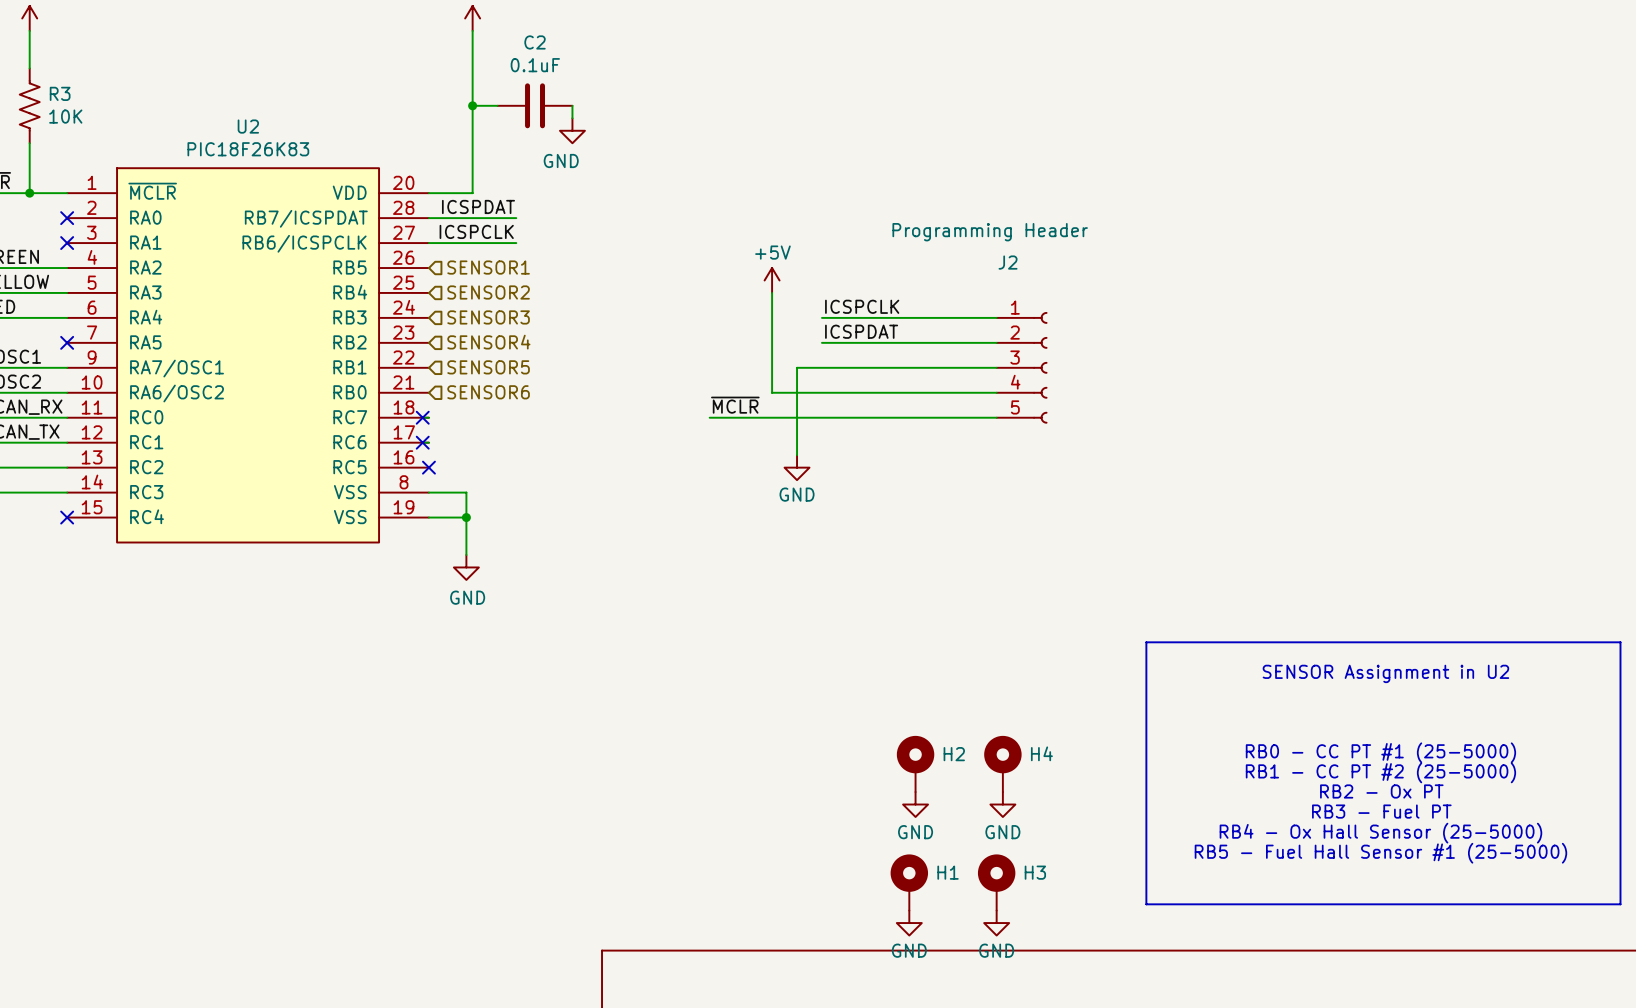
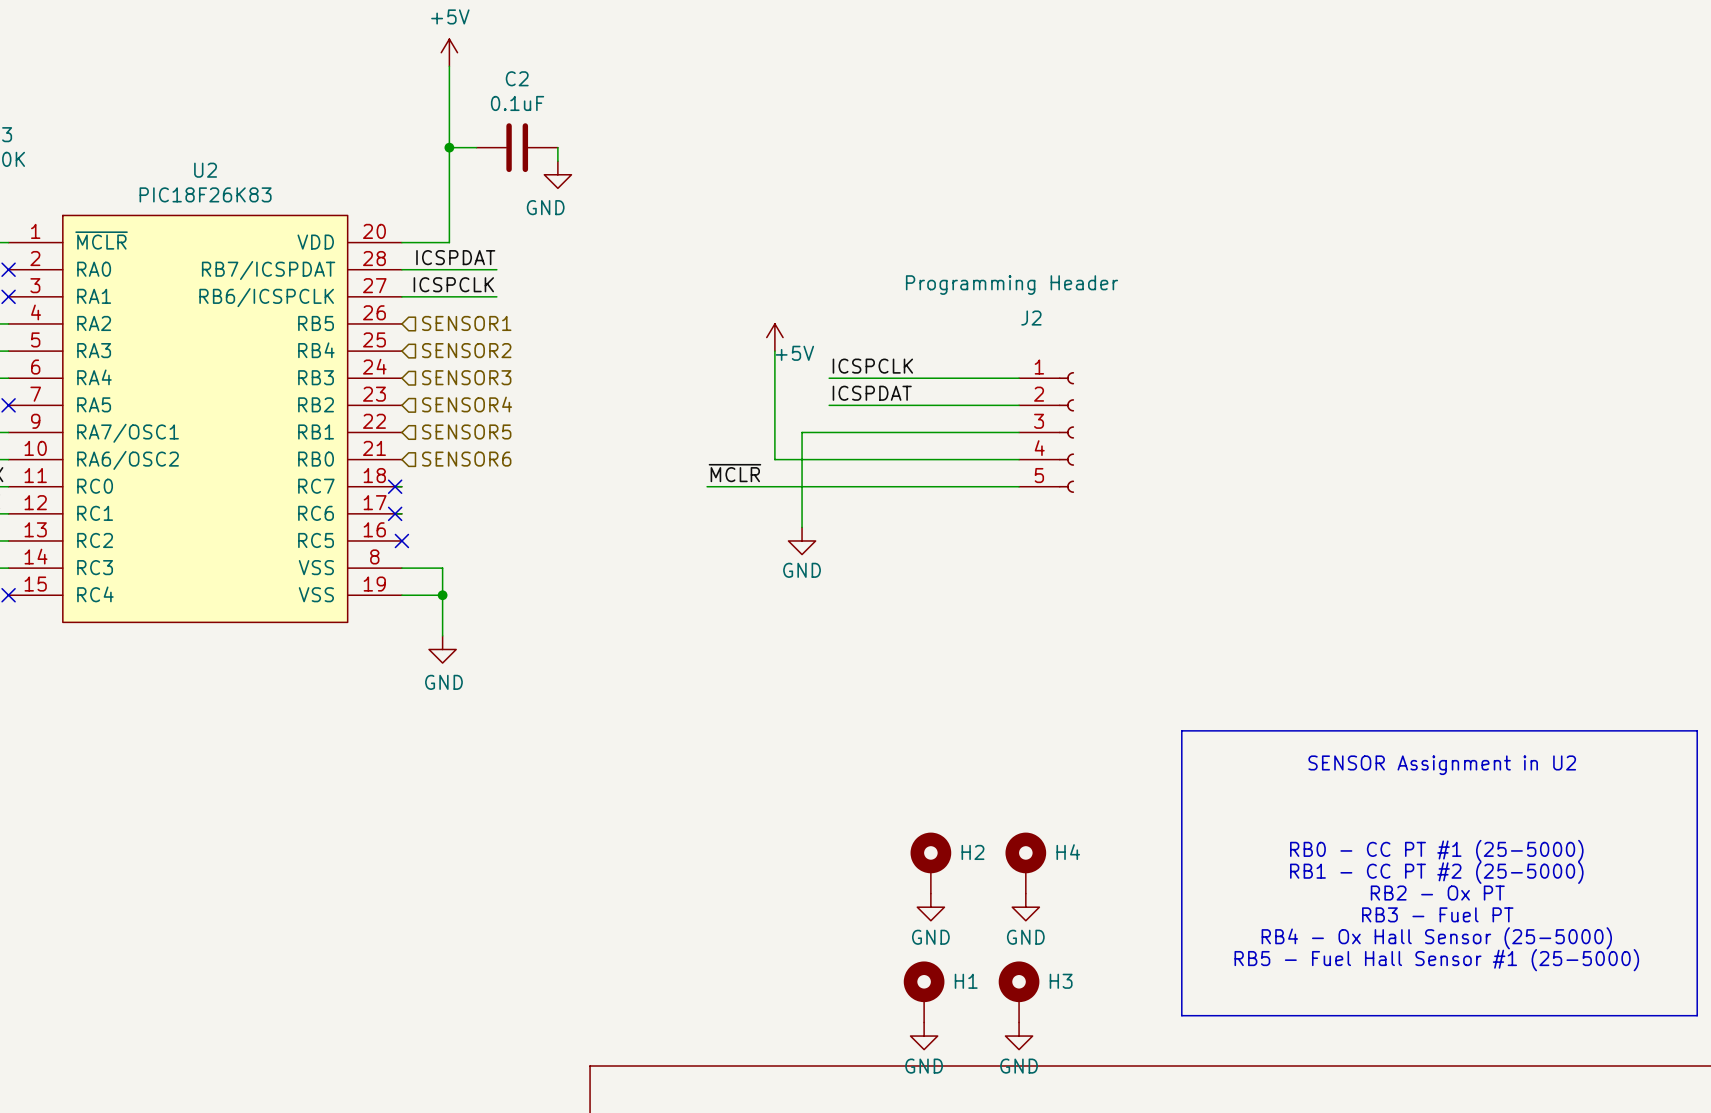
power symbol text position: +5V (772, 252) -> +5V (794, 353)

